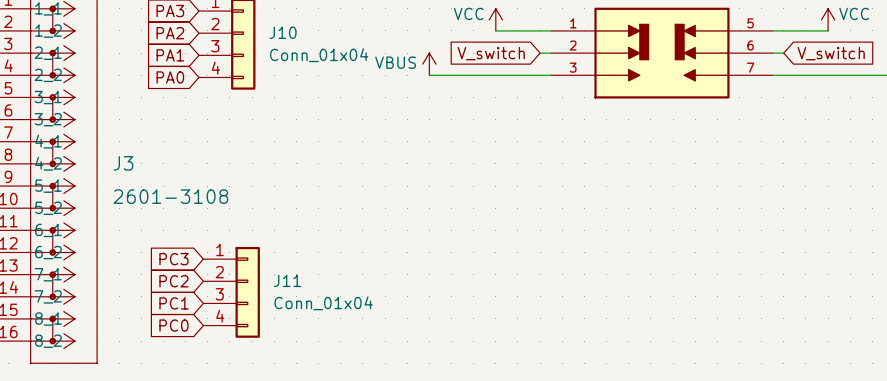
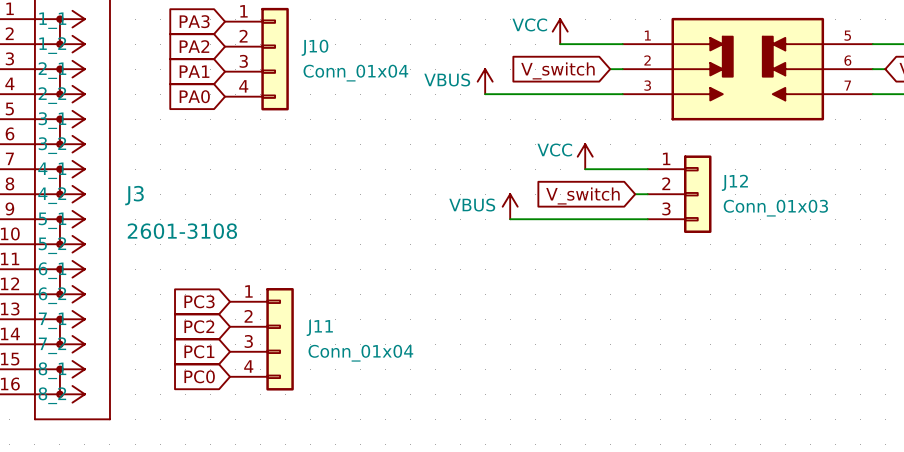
power symbol: none -> VCC (585, 156)
wire: none -> (585, 169) (647, 169)
wire: none -> (635, 194) (647, 194)
J12: none -> Conn_01x03 (679, 194)
global label: none -> V_switch (582, 195)
power symbol: none -> VBUS (510, 206)
wire: none -> (510, 219) (647, 219)

